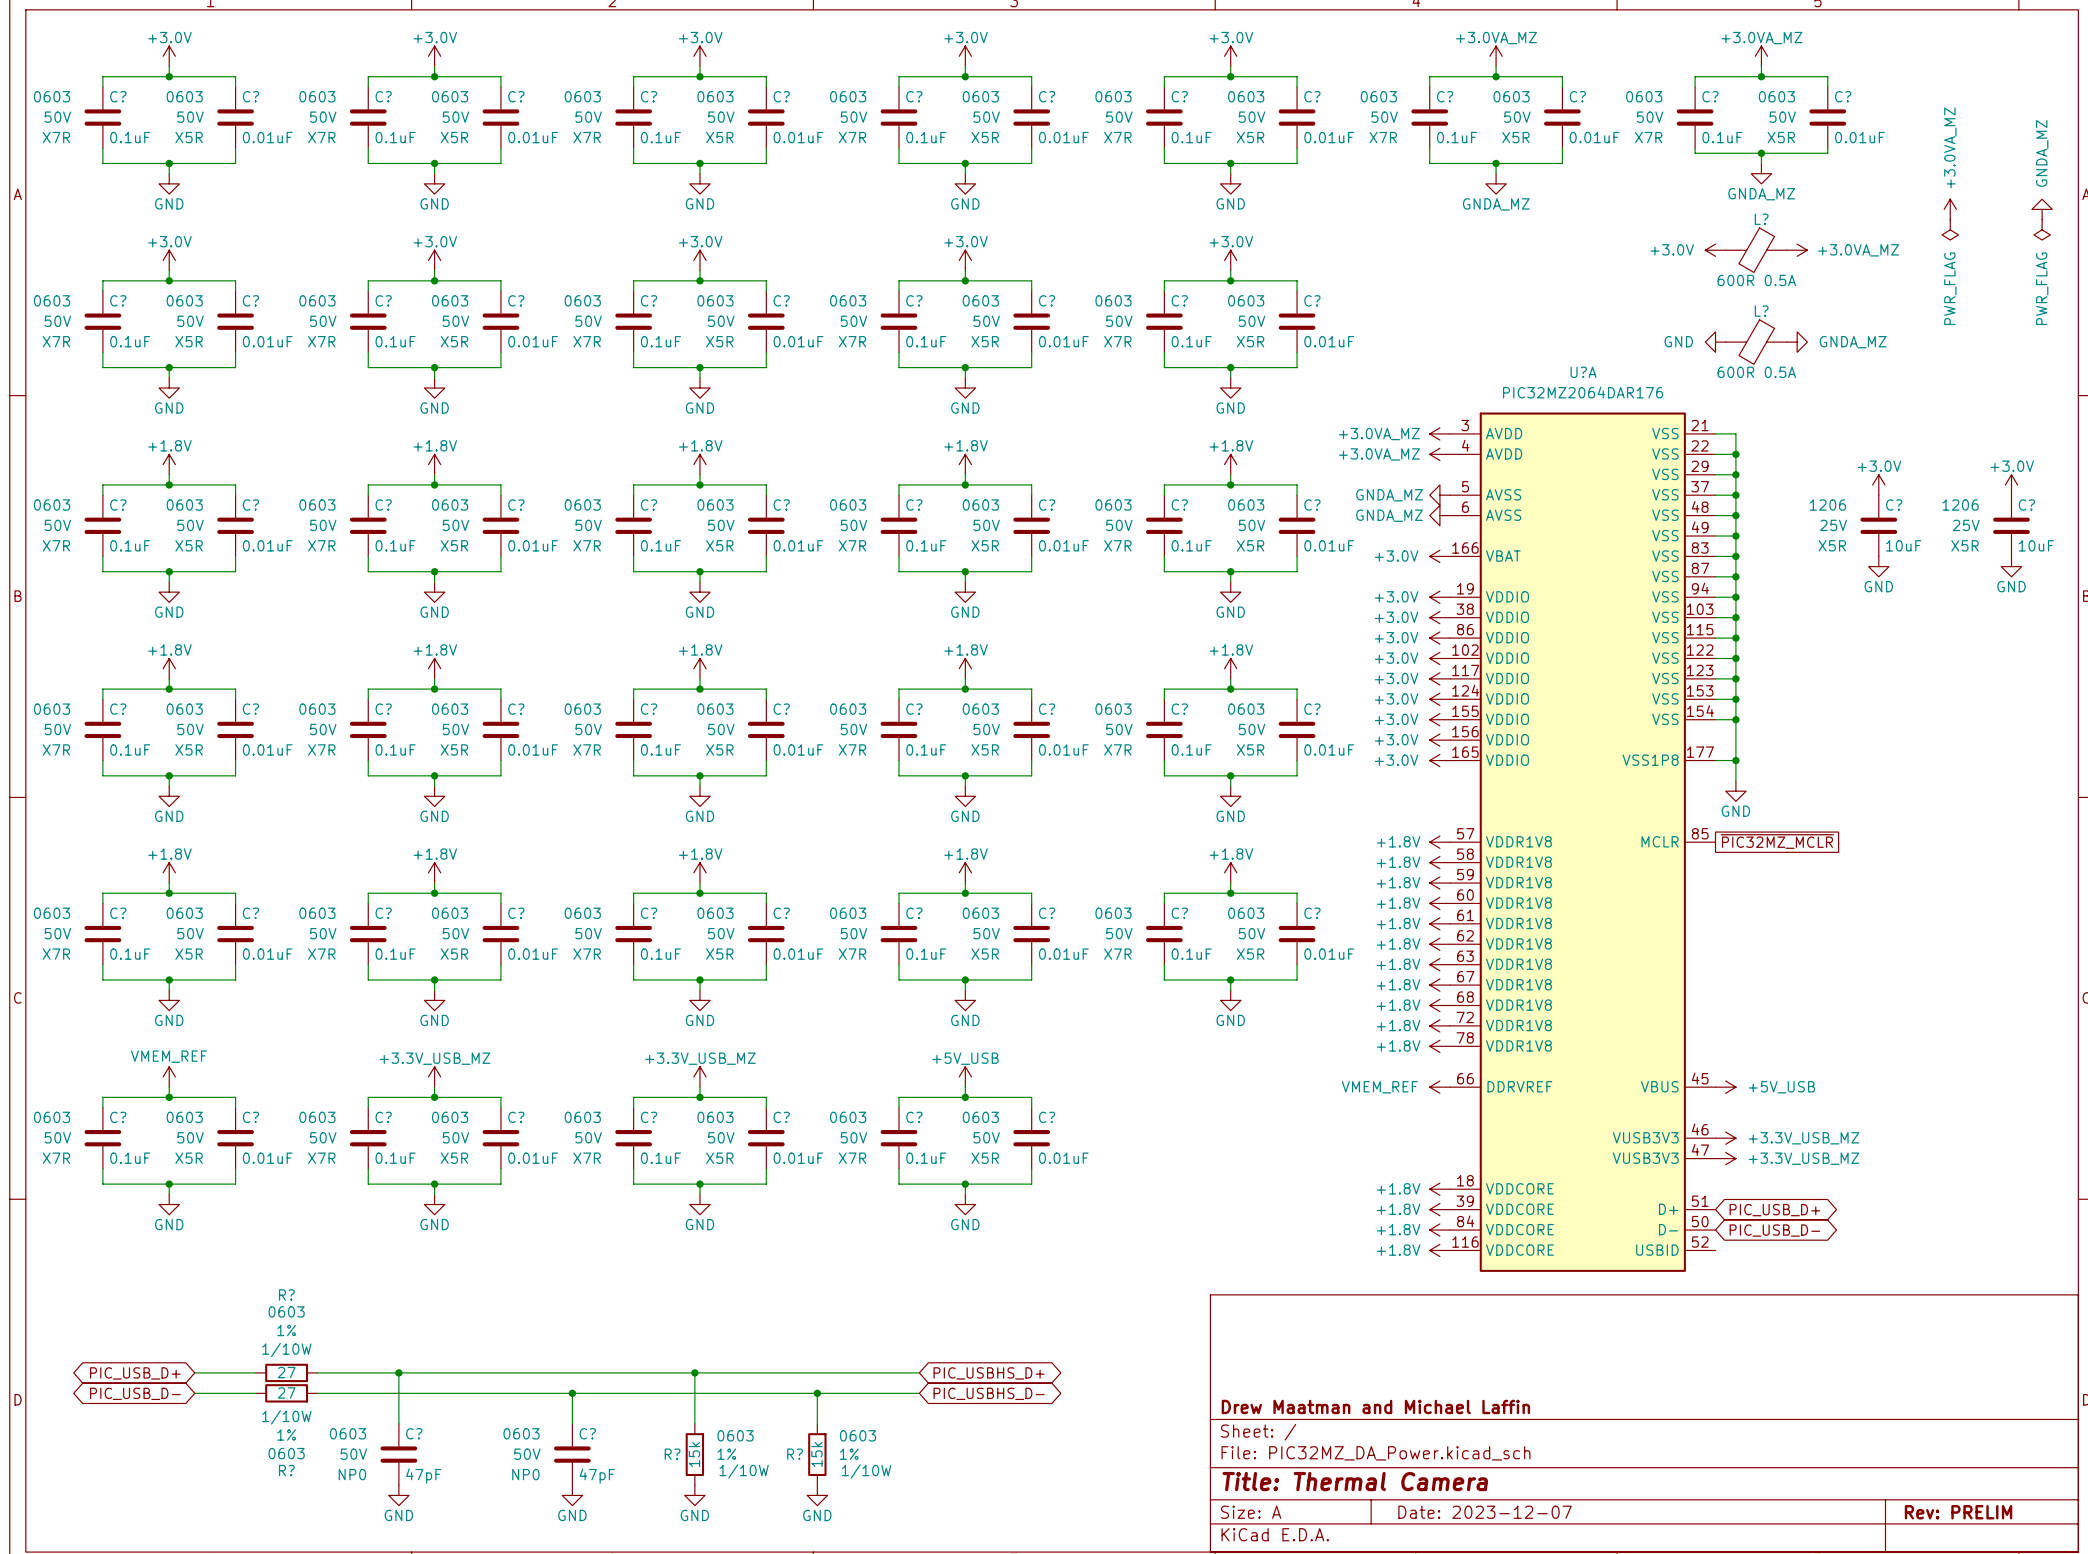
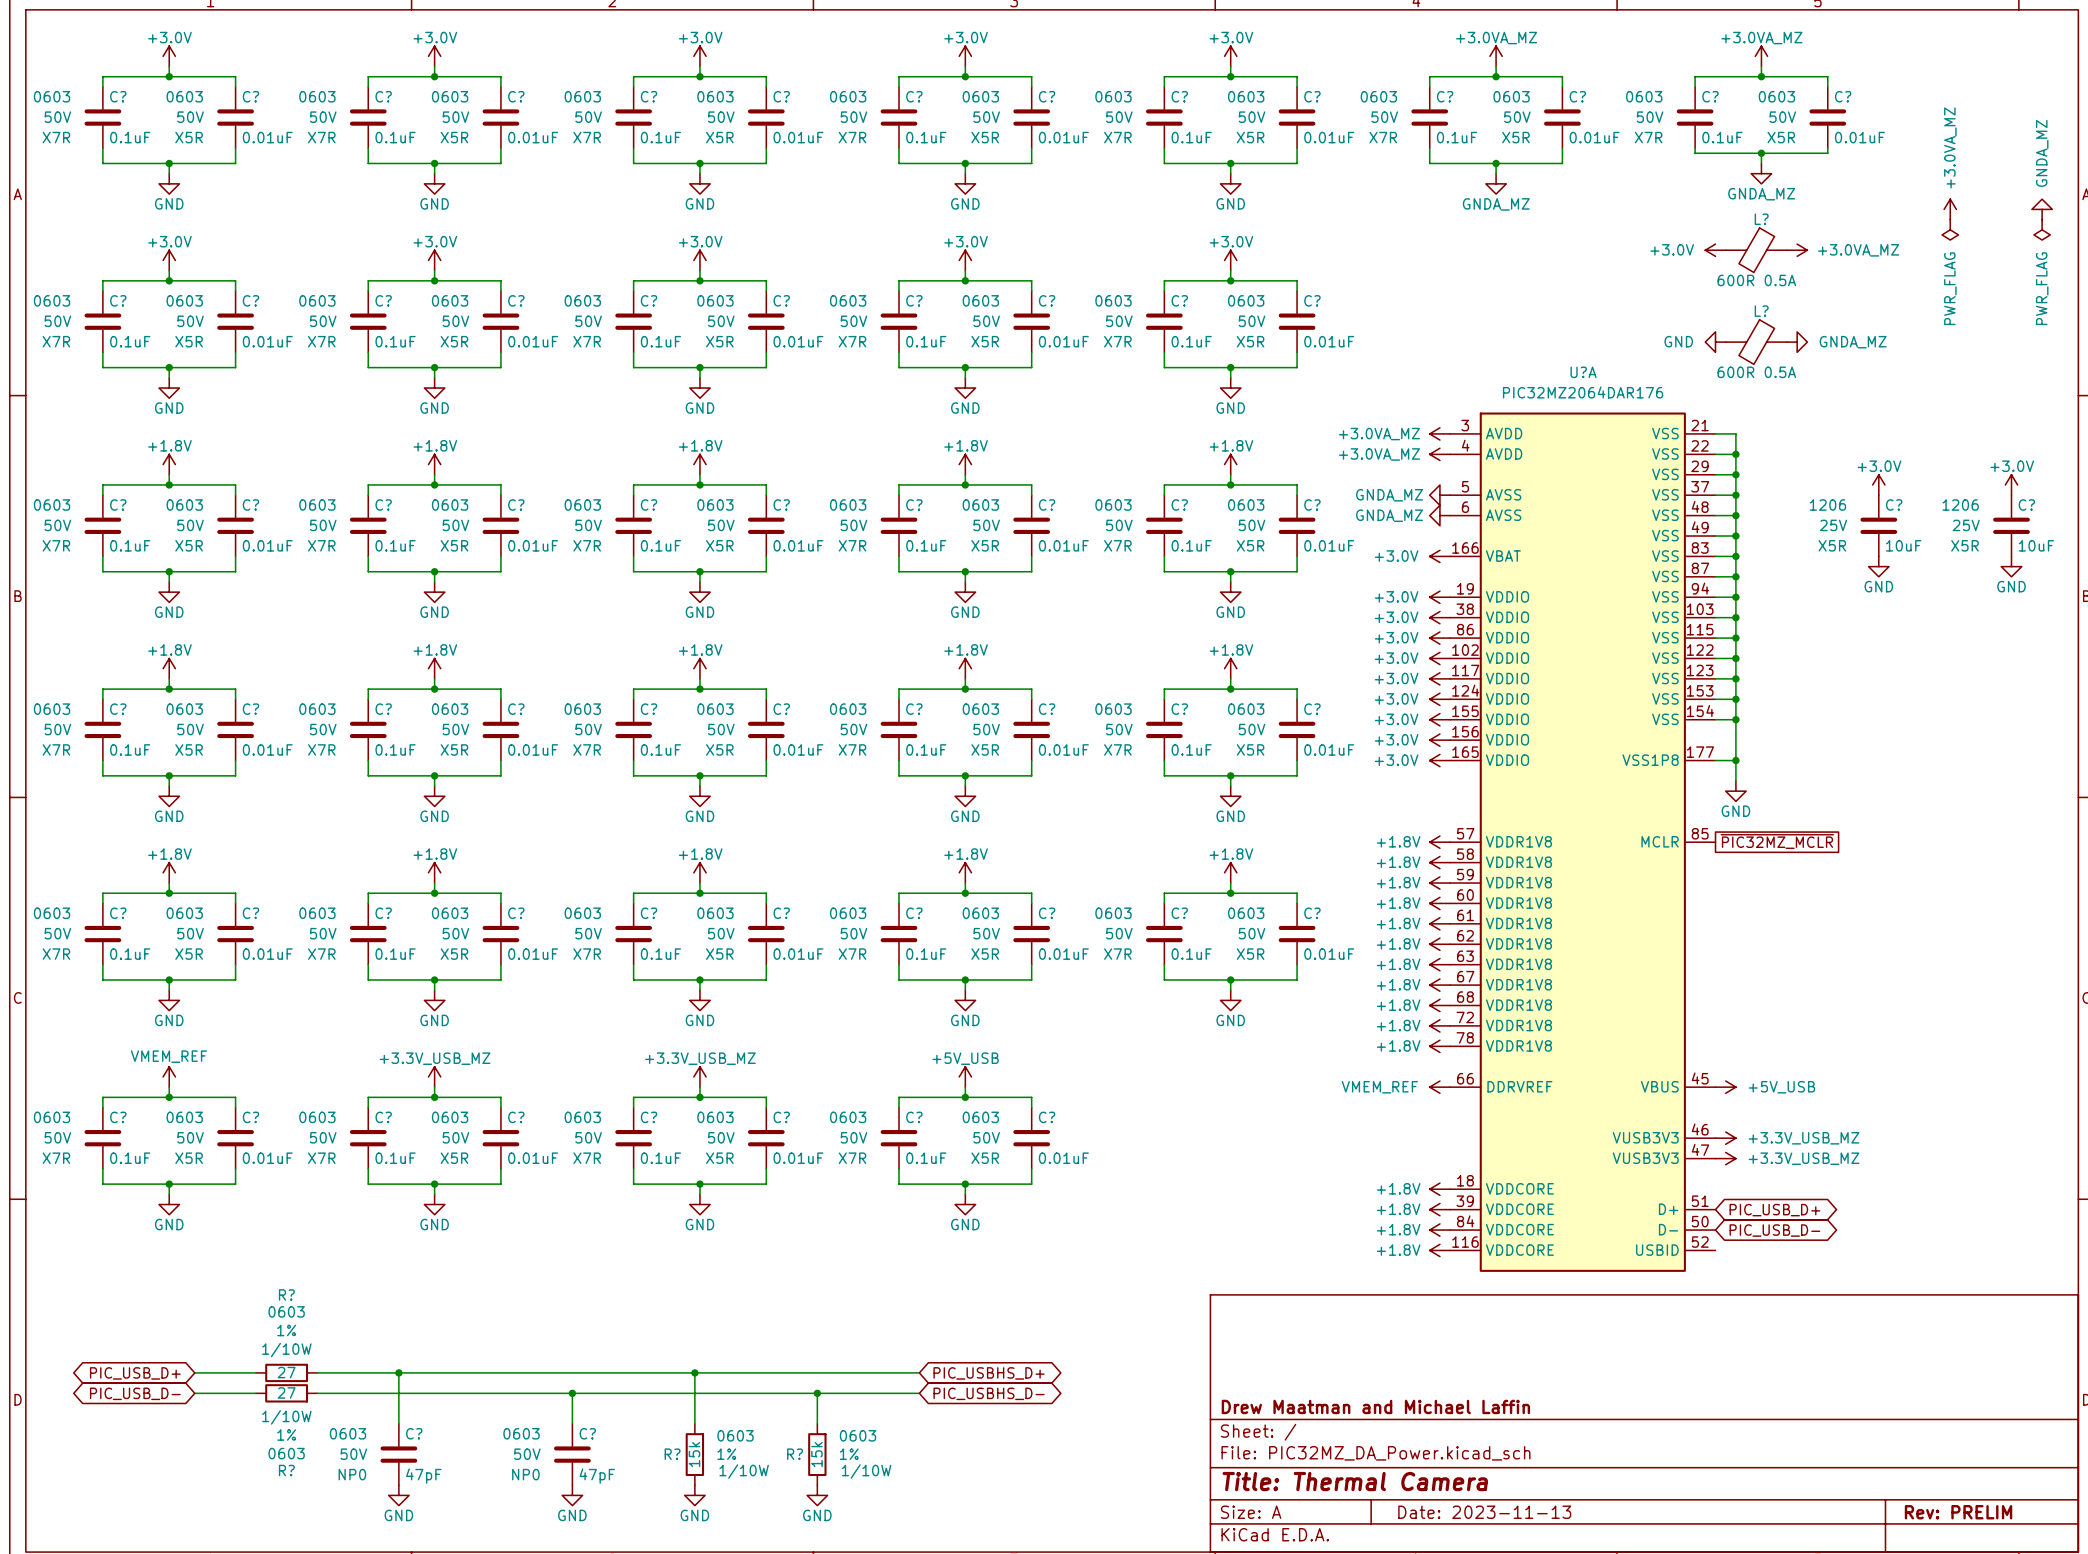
title block: Date: 2023-12-07 (1485, 1512) -> Date: 2023-11-13 (1484, 1512)

